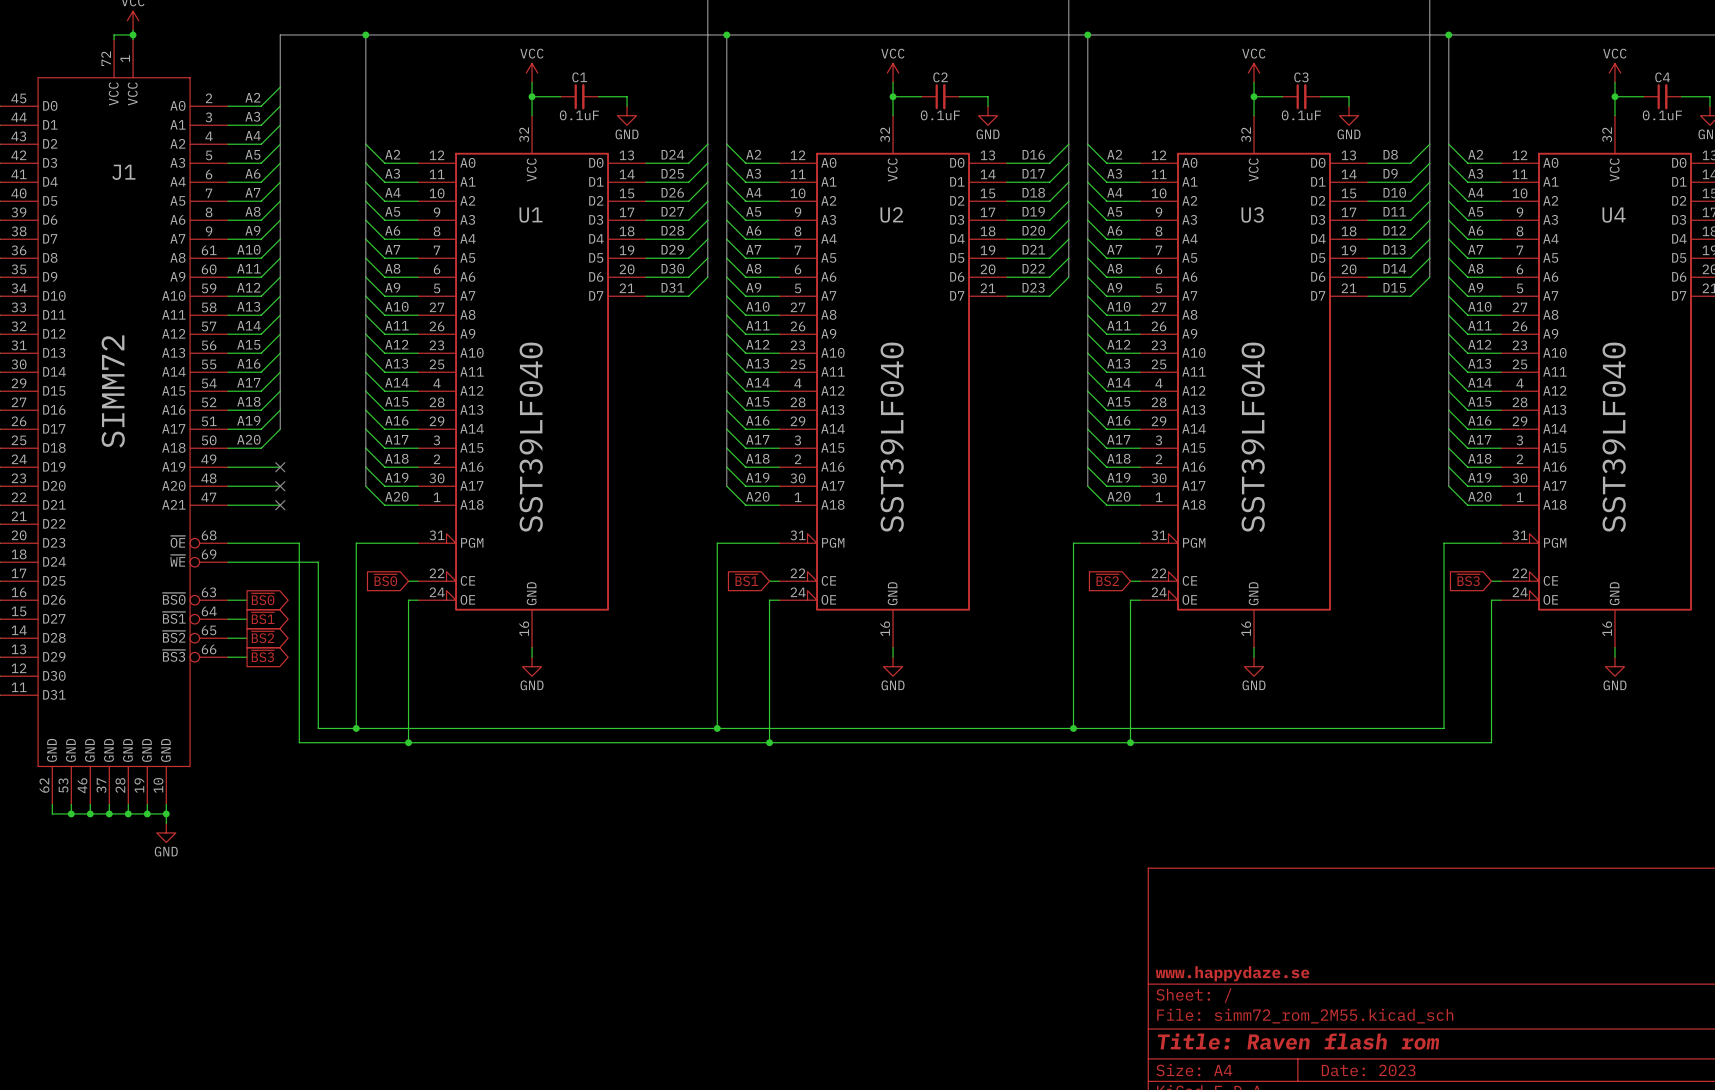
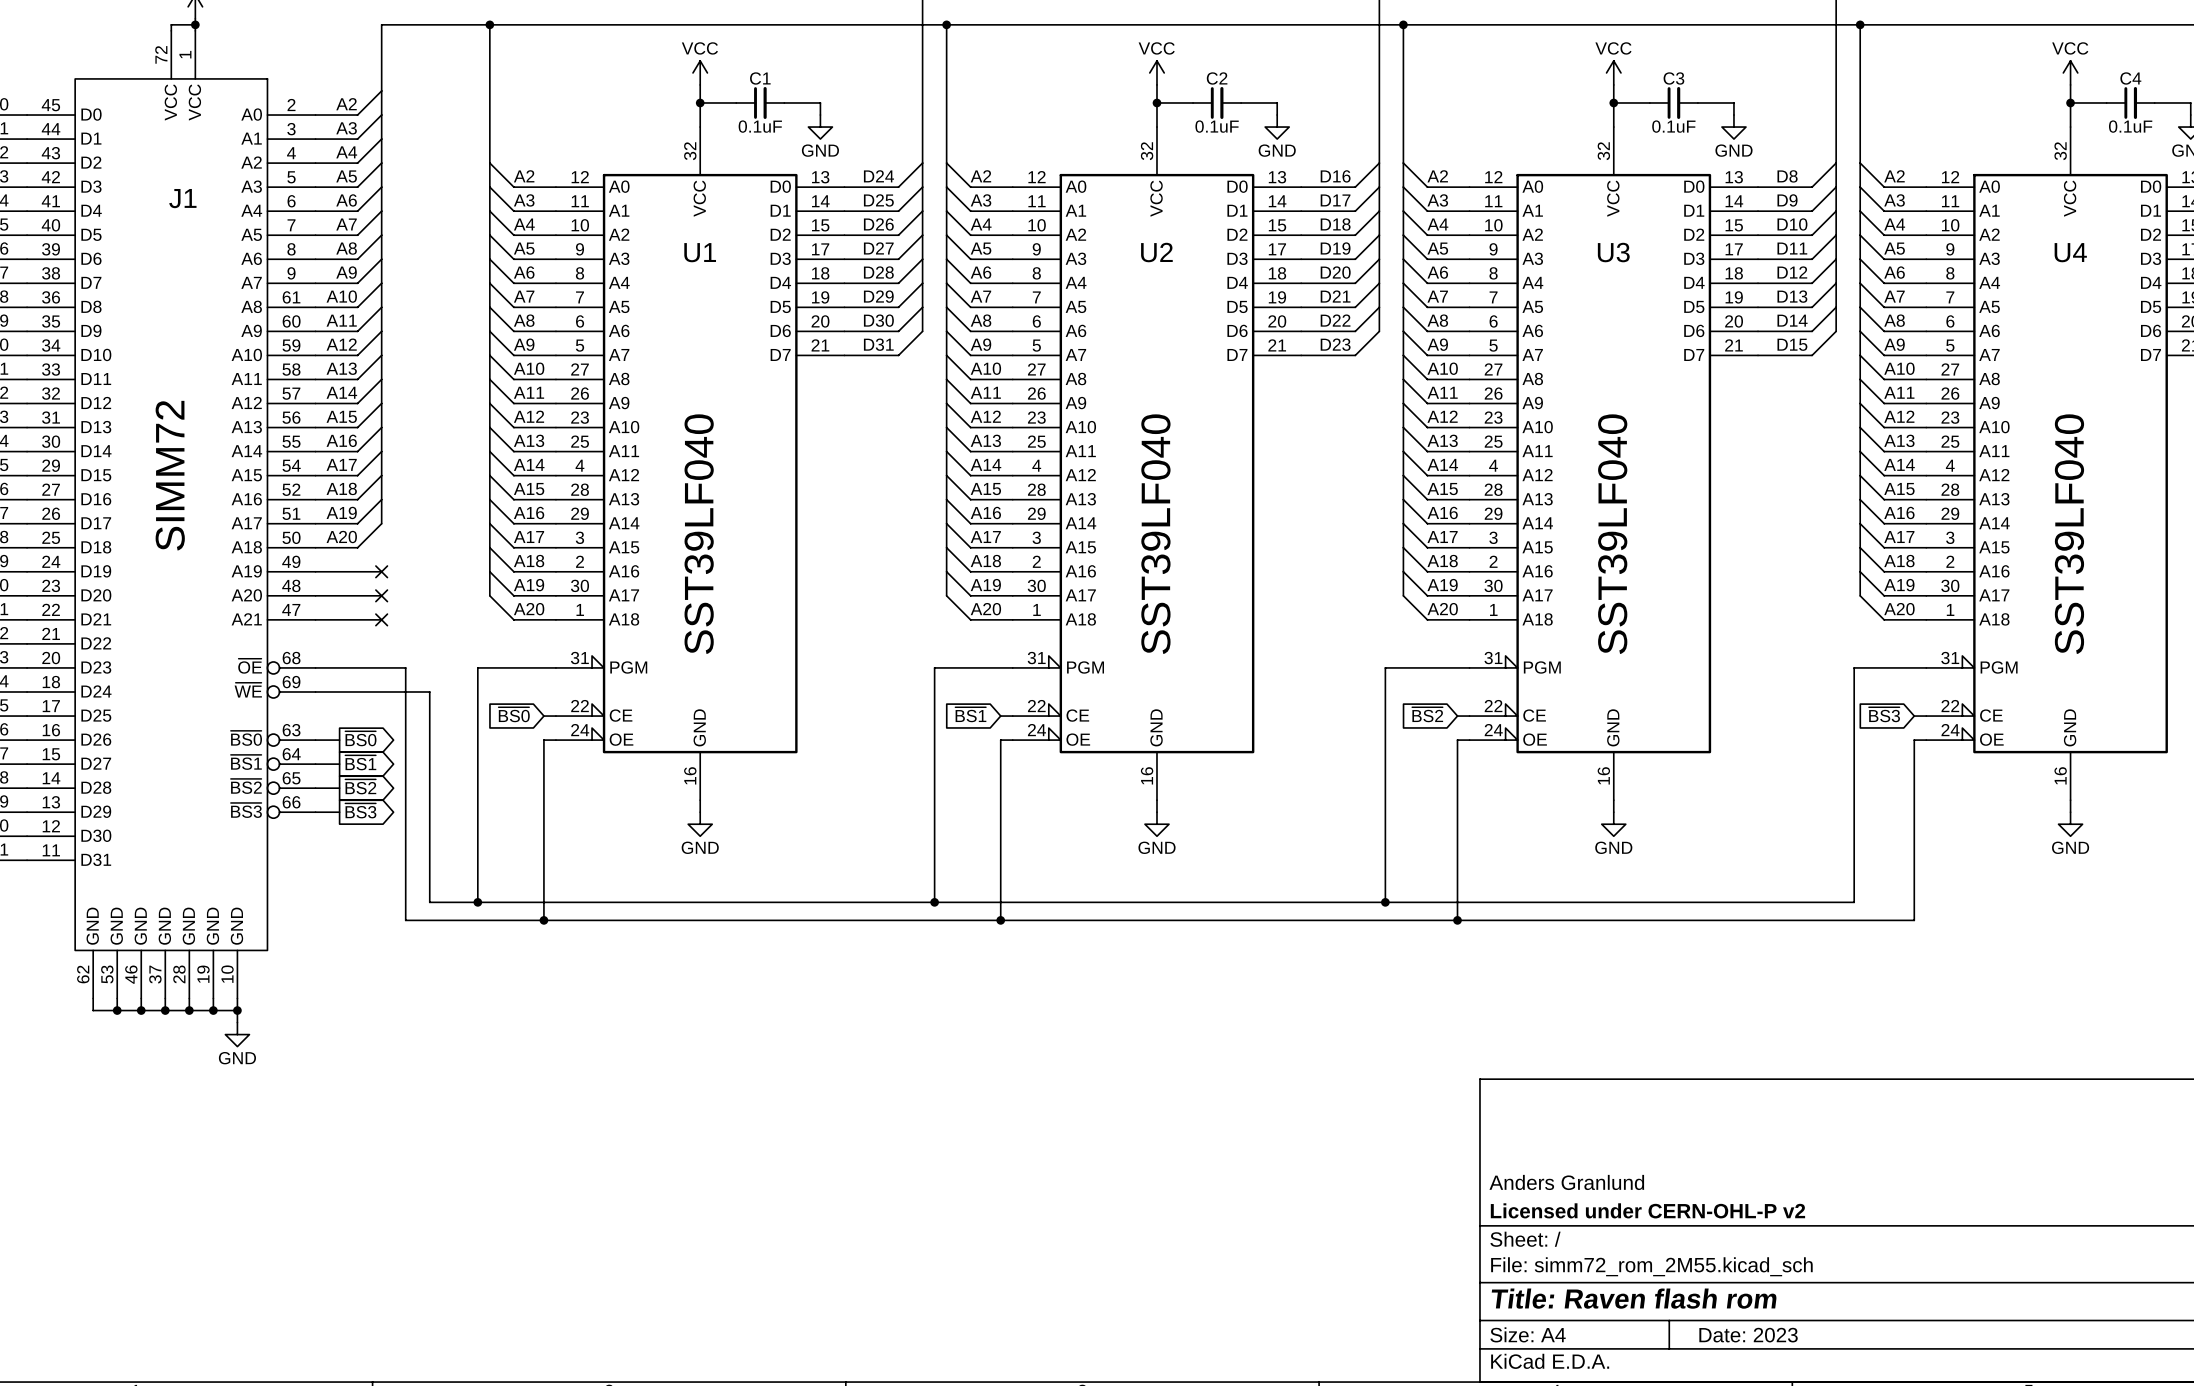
title block: none -> Anders Granlund (1566, 1182)
title block: www.happydaze.se (1232, 973) -> Licensed under CERN-OHL-P v2 (1647, 1210)

